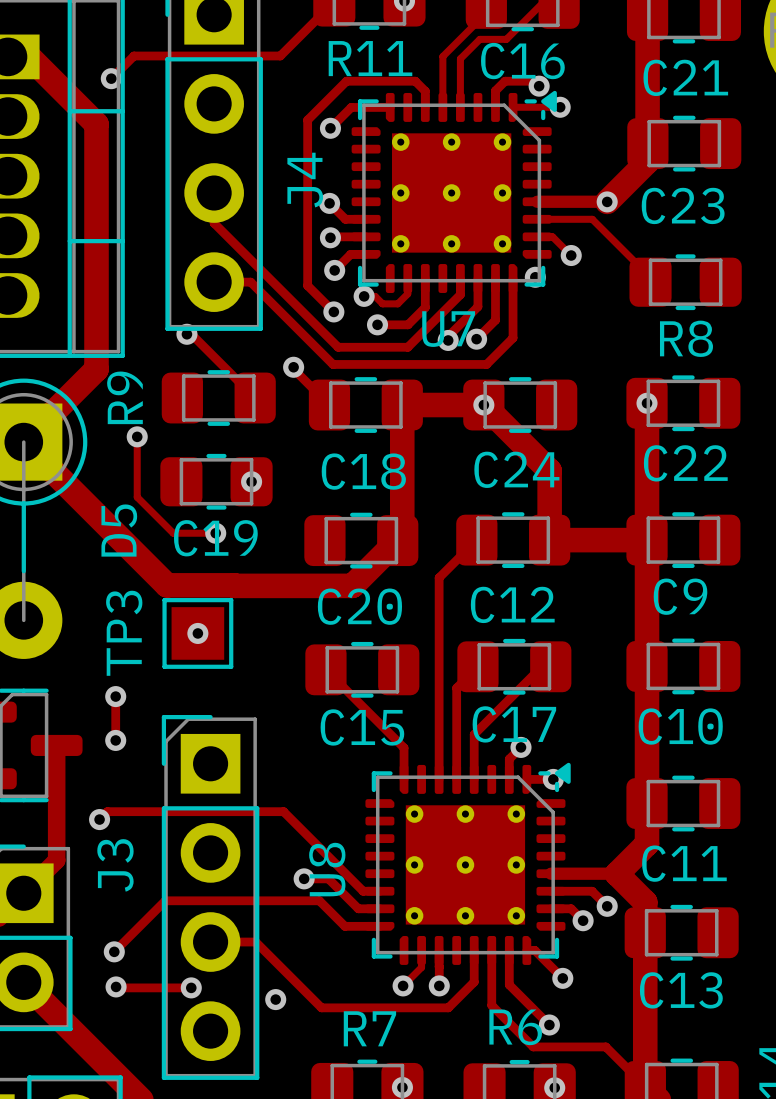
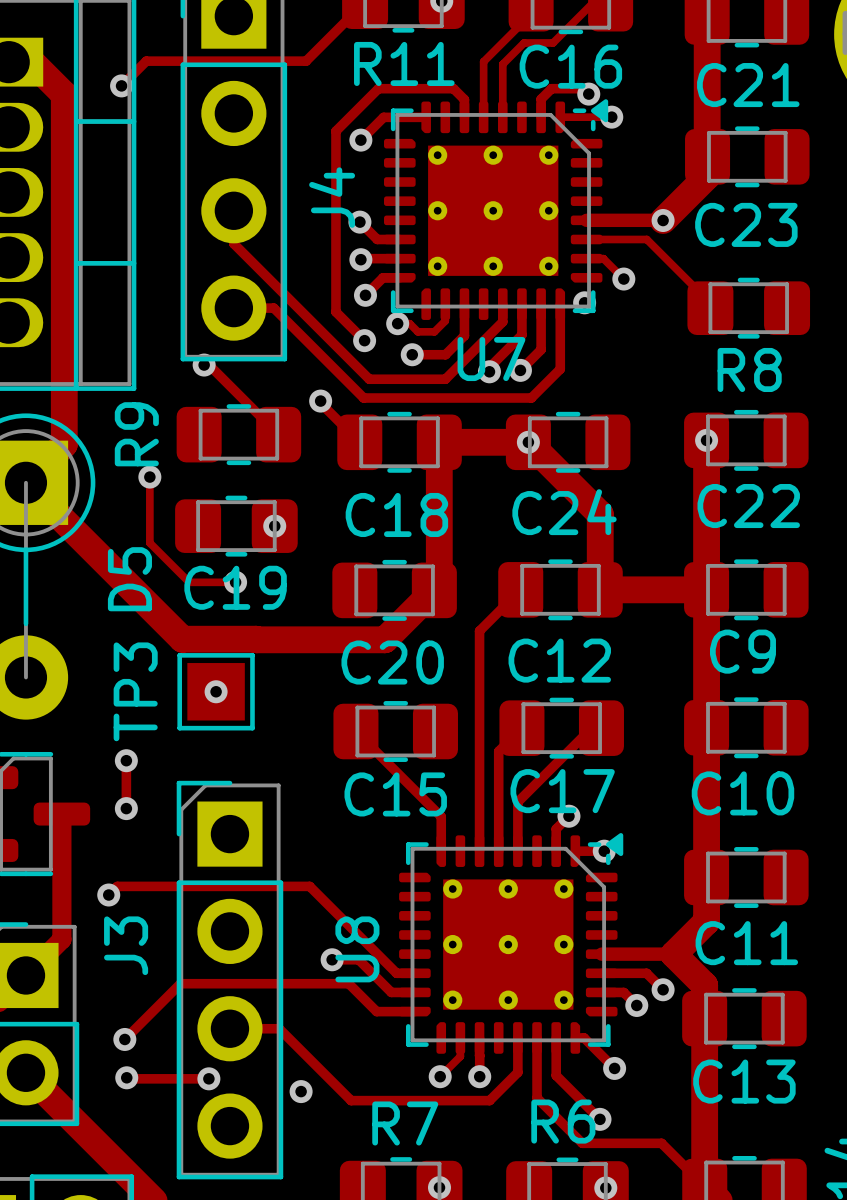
track: (58, 86) (96, 124) (96, 369) (58, 407) -> (64, 94) (64, 444)

